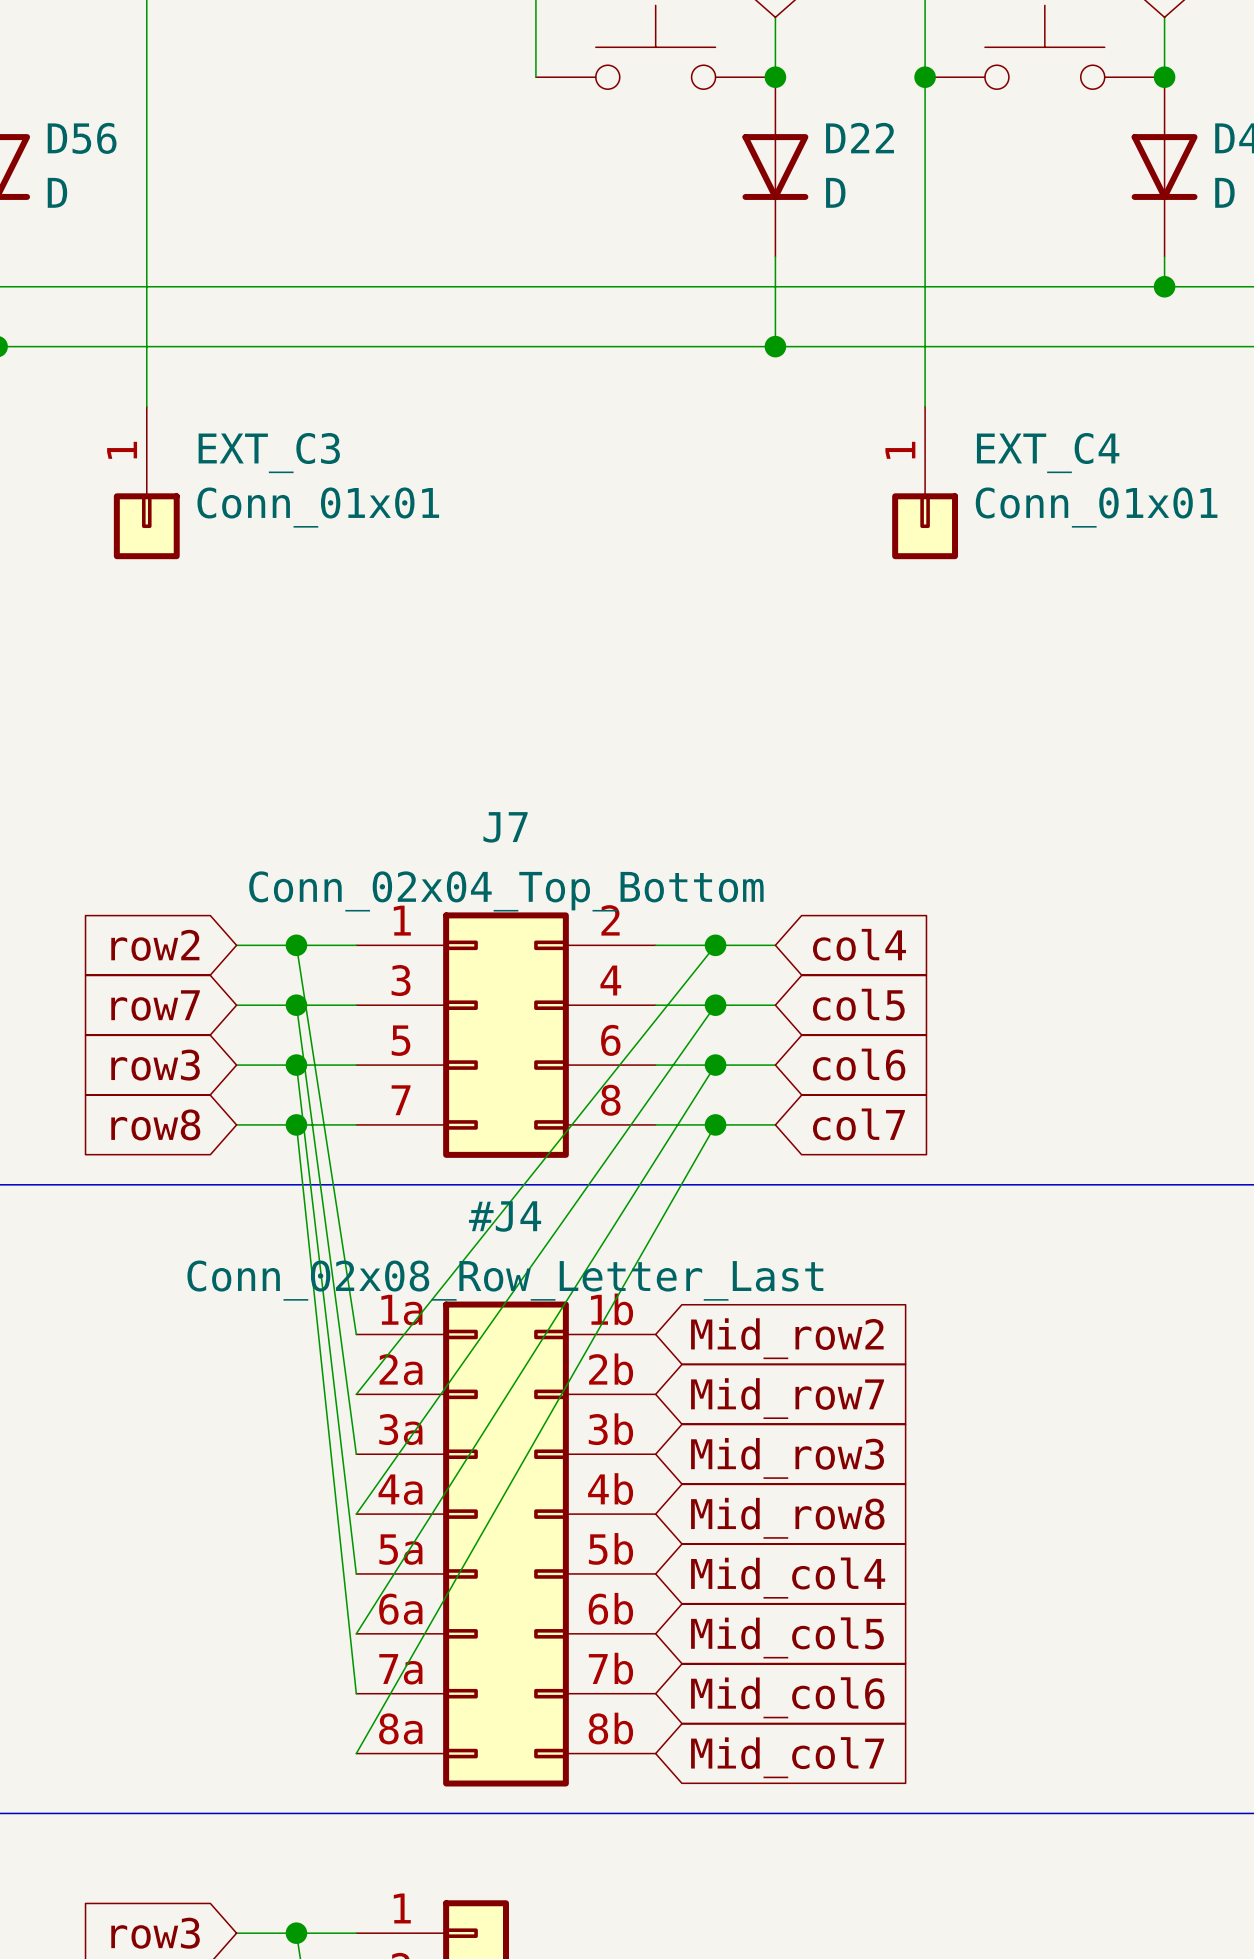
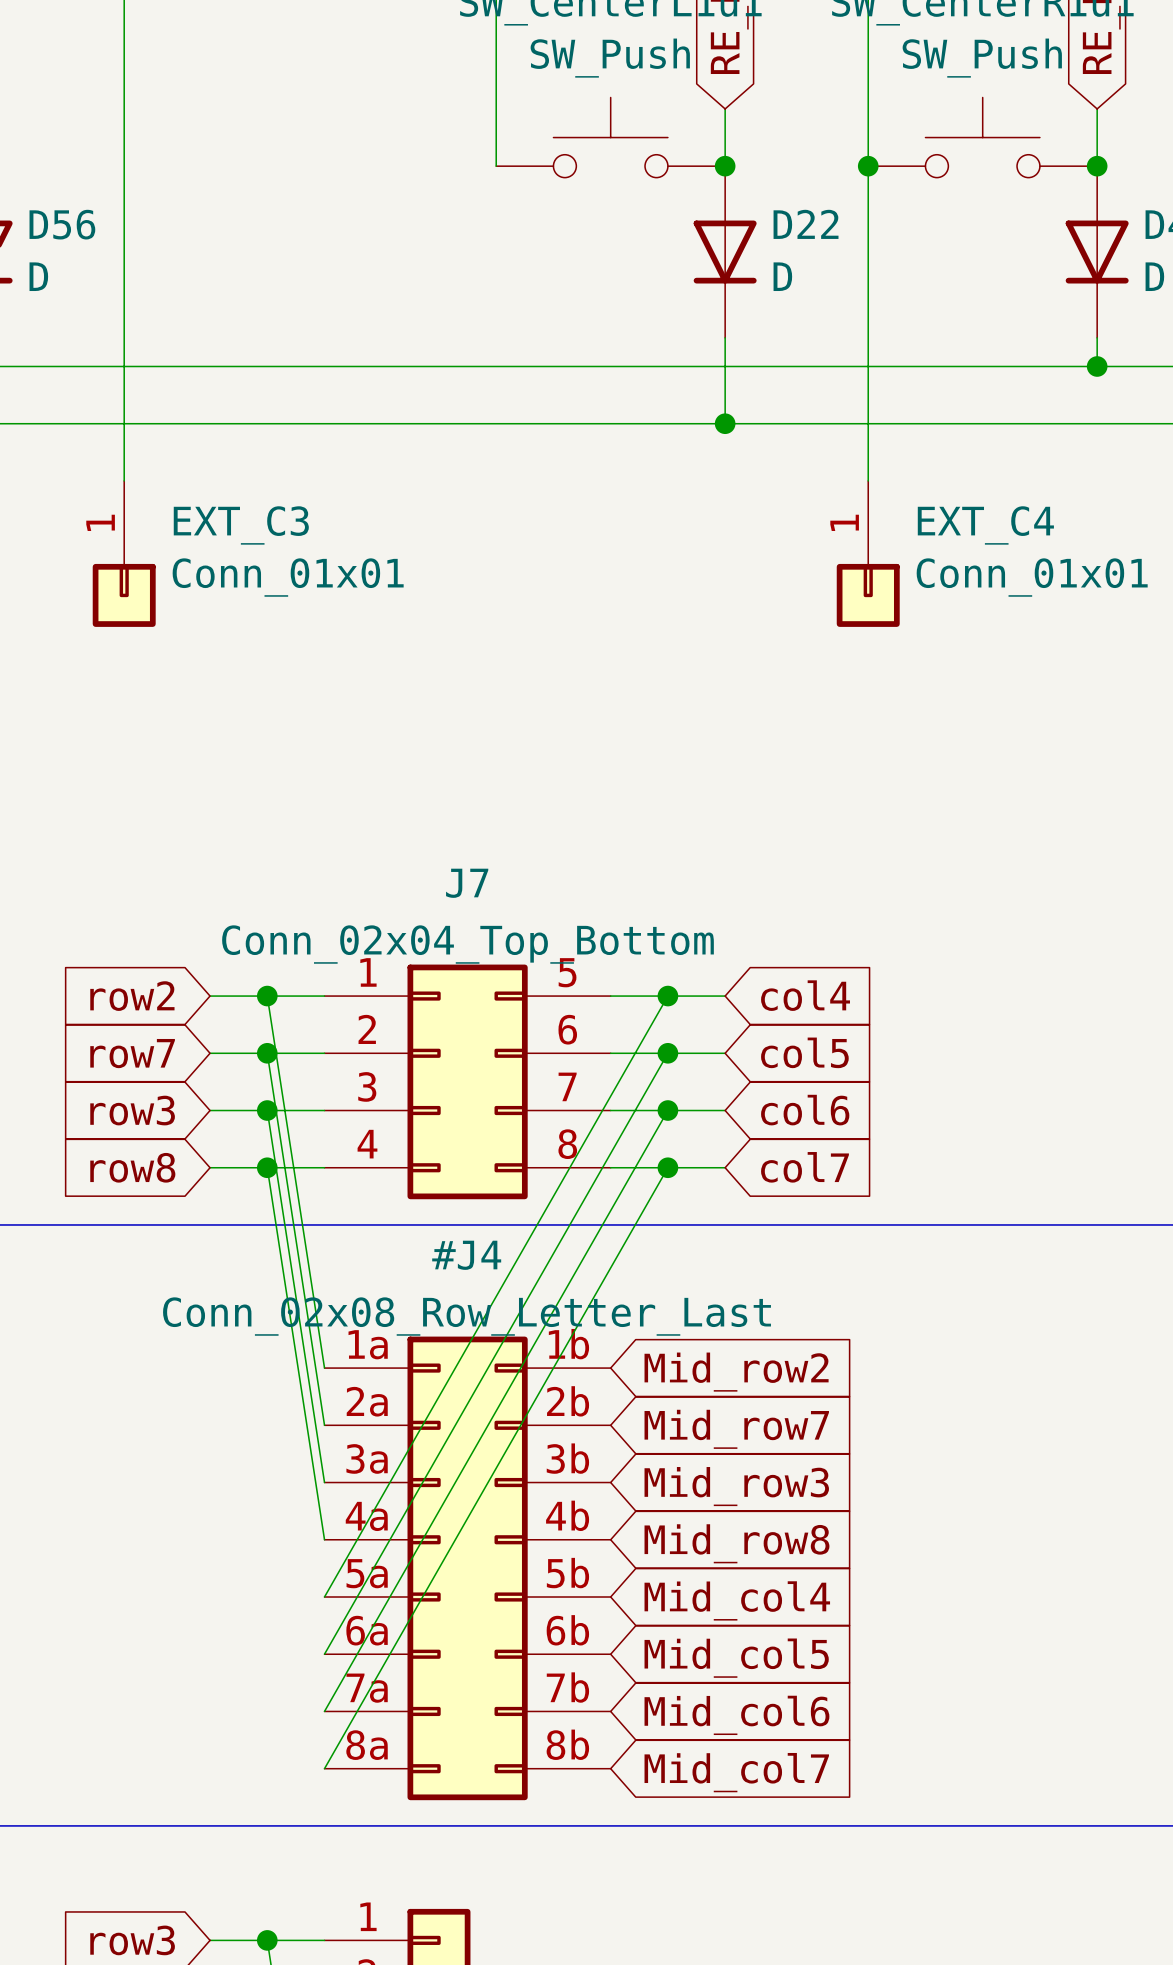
J7 pin number: 2 (610, 920) -> 5 (567, 972)
wire: (715, 945) (356, 1394) -> (667, 996) (324, 1597)
J7 pin number: 3 (401, 980) -> 2 (367, 1029)
J7 pin number: 4 (610, 980) -> 6 (567, 1029)
wire: (296, 1005) (356, 1454) -> (267, 1053) (324, 1425)
wire: (715, 1005) (356, 1514) -> (667, 1053) (324, 1654)
J7 pin number: 5 (401, 1040) -> 3 (367, 1086)
J7 pin number: 6 (610, 1040) -> 7 (567, 1086)
wire: (296, 1065) (356, 1573) -> (267, 1110) (324, 1482)
wire: (715, 1065) (356, 1633) -> (667, 1110) (324, 1711)
J7 pin number: 7 (401, 1100) -> 4 (367, 1144)
wire: (296, 1124) (356, 1693) -> (267, 1167) (324, 1539)

